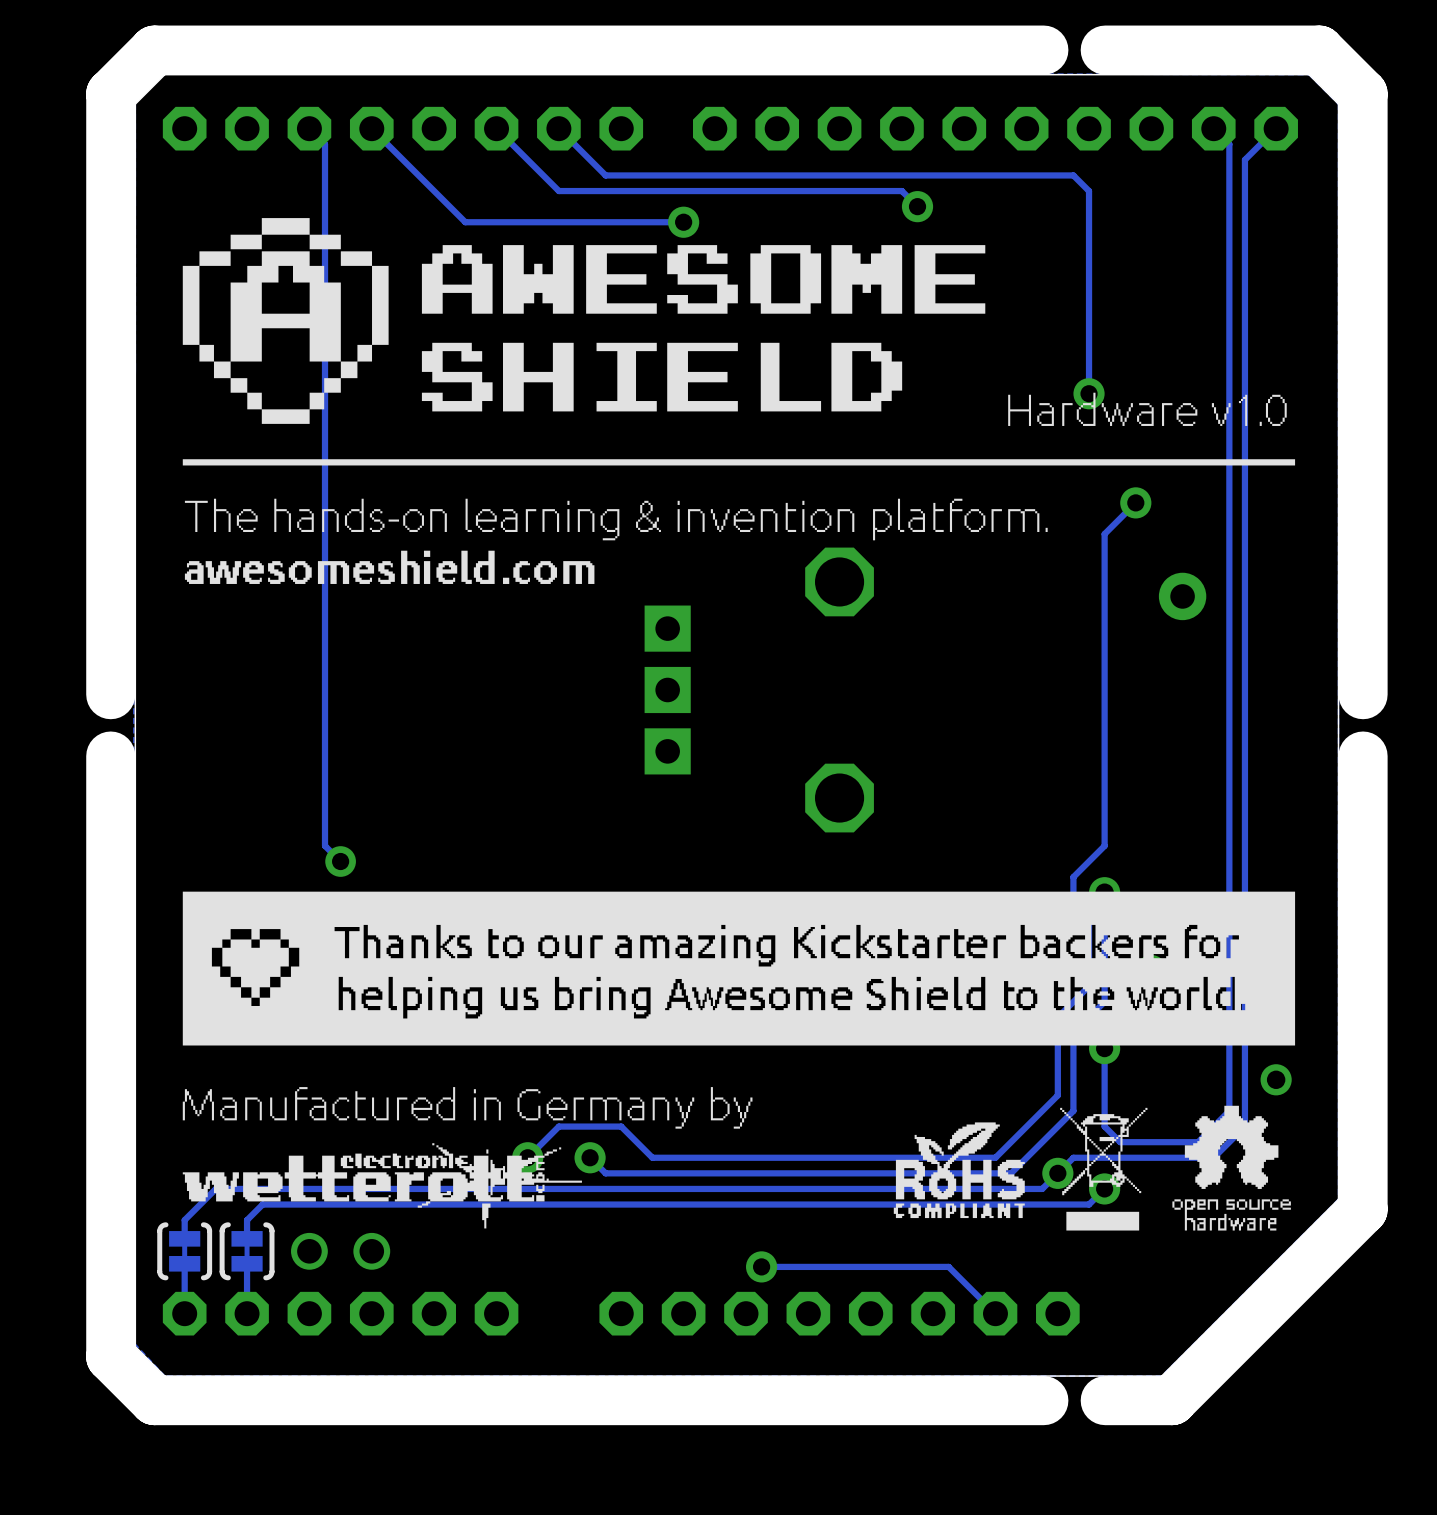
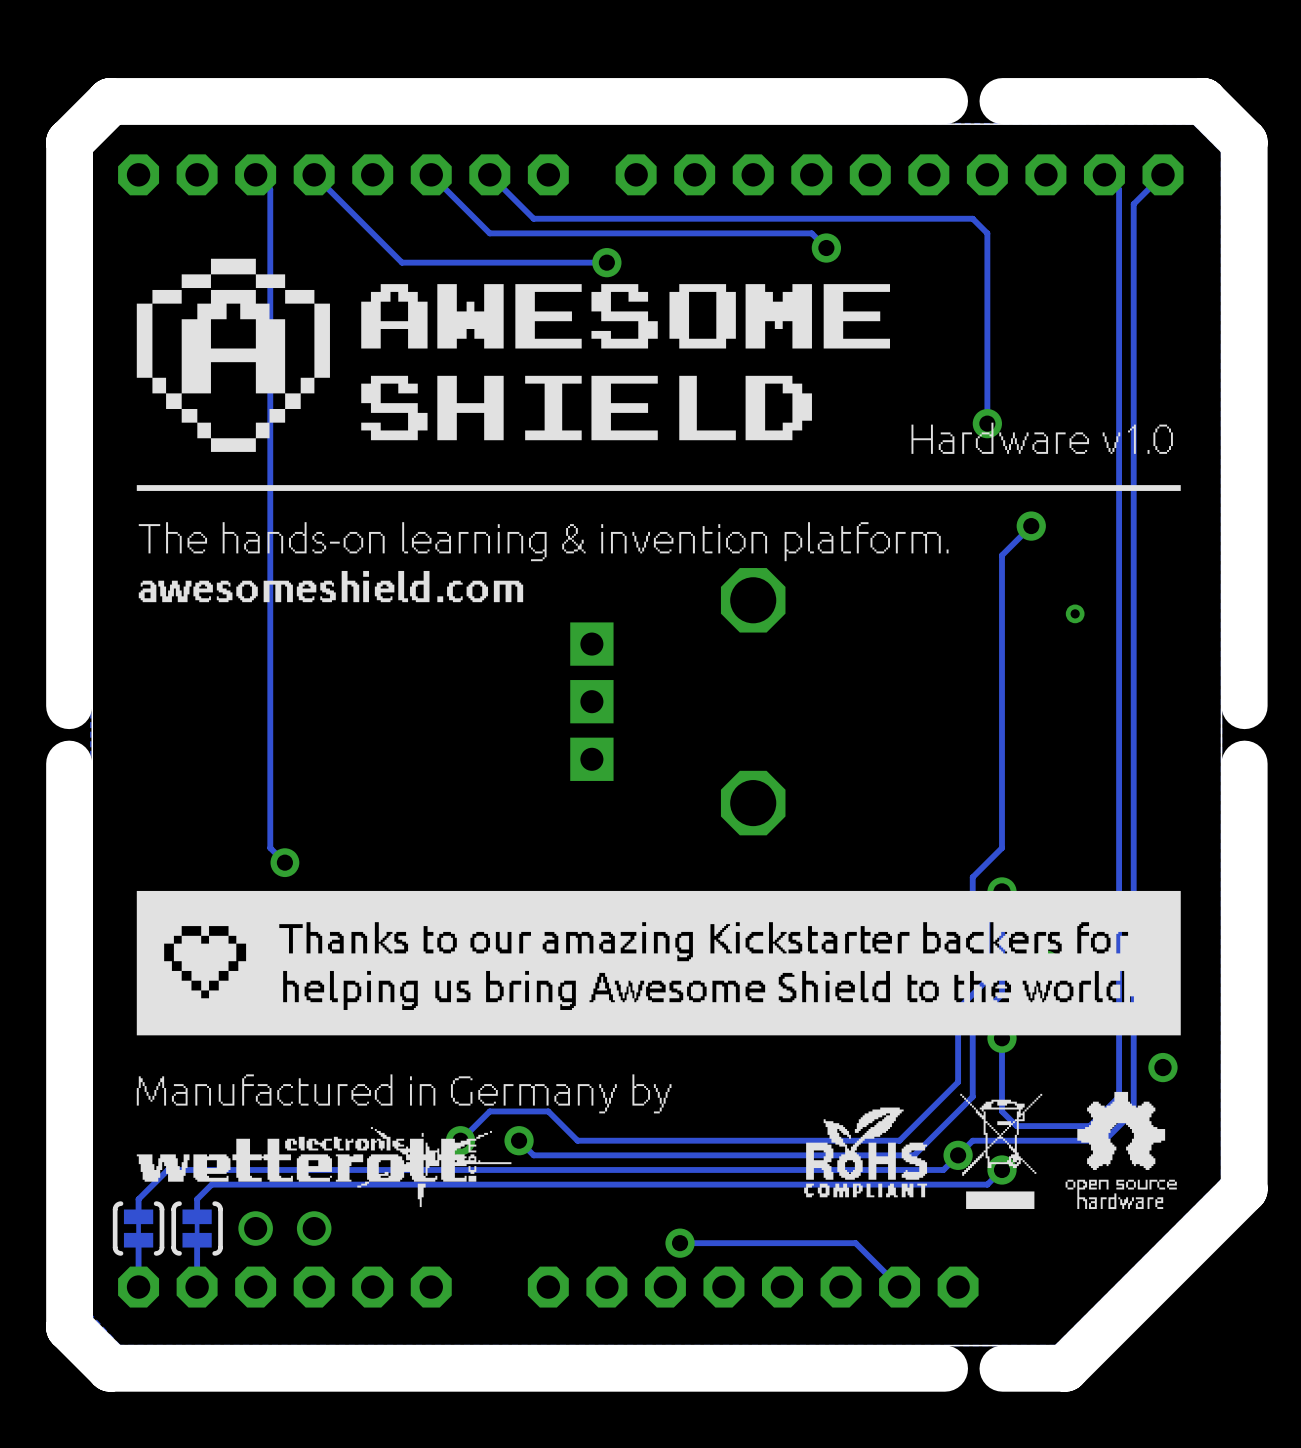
via size: [1158, 572, 1207, 621] -> [1065, 604, 1085, 624]

